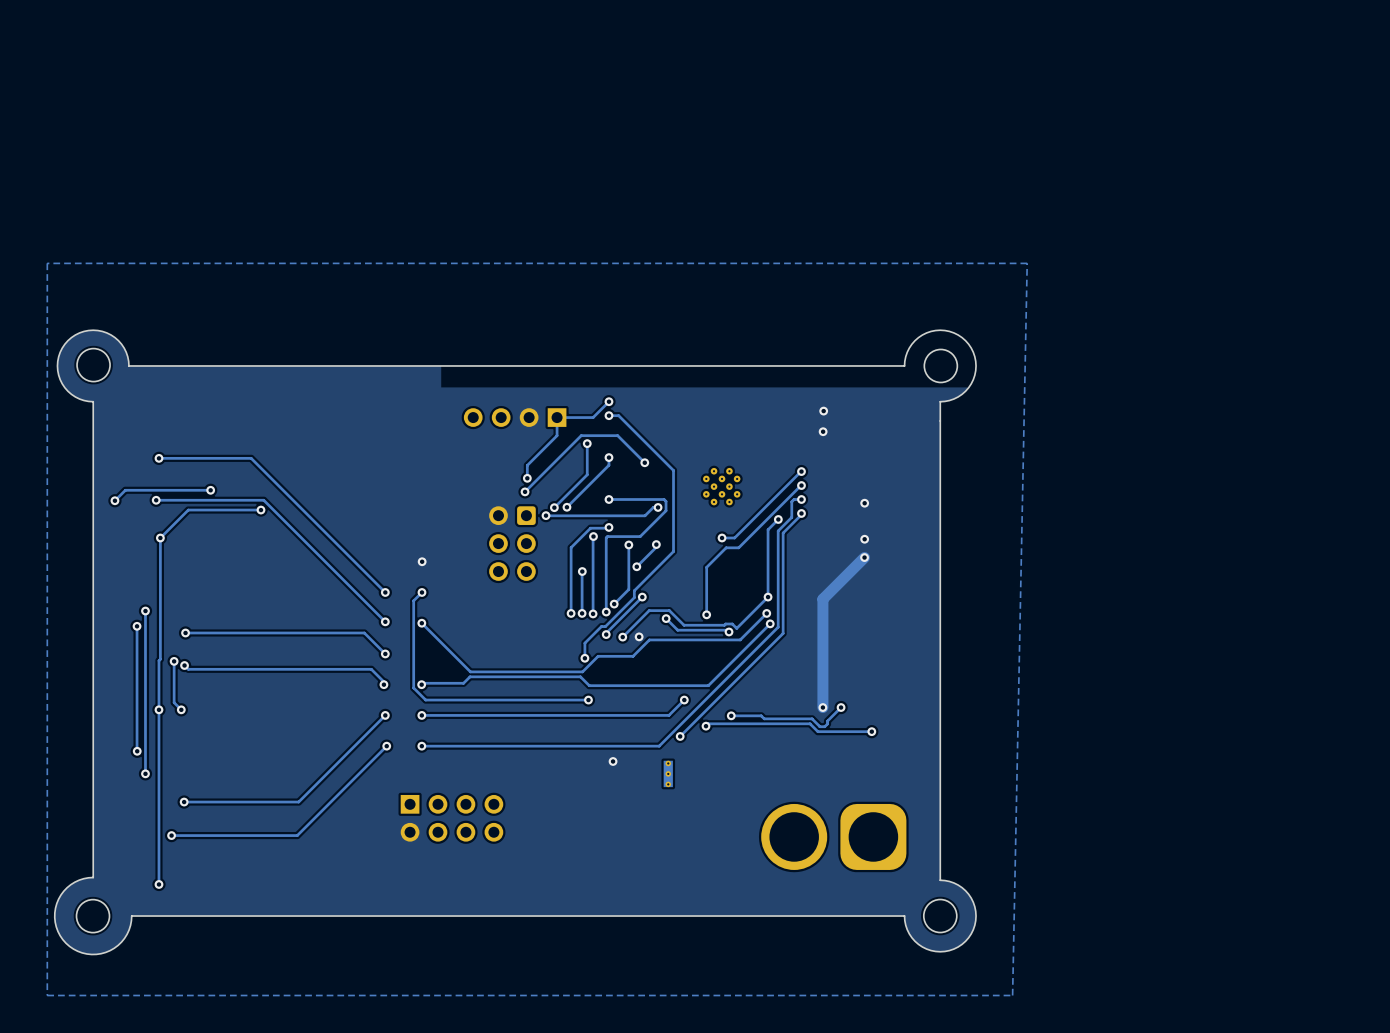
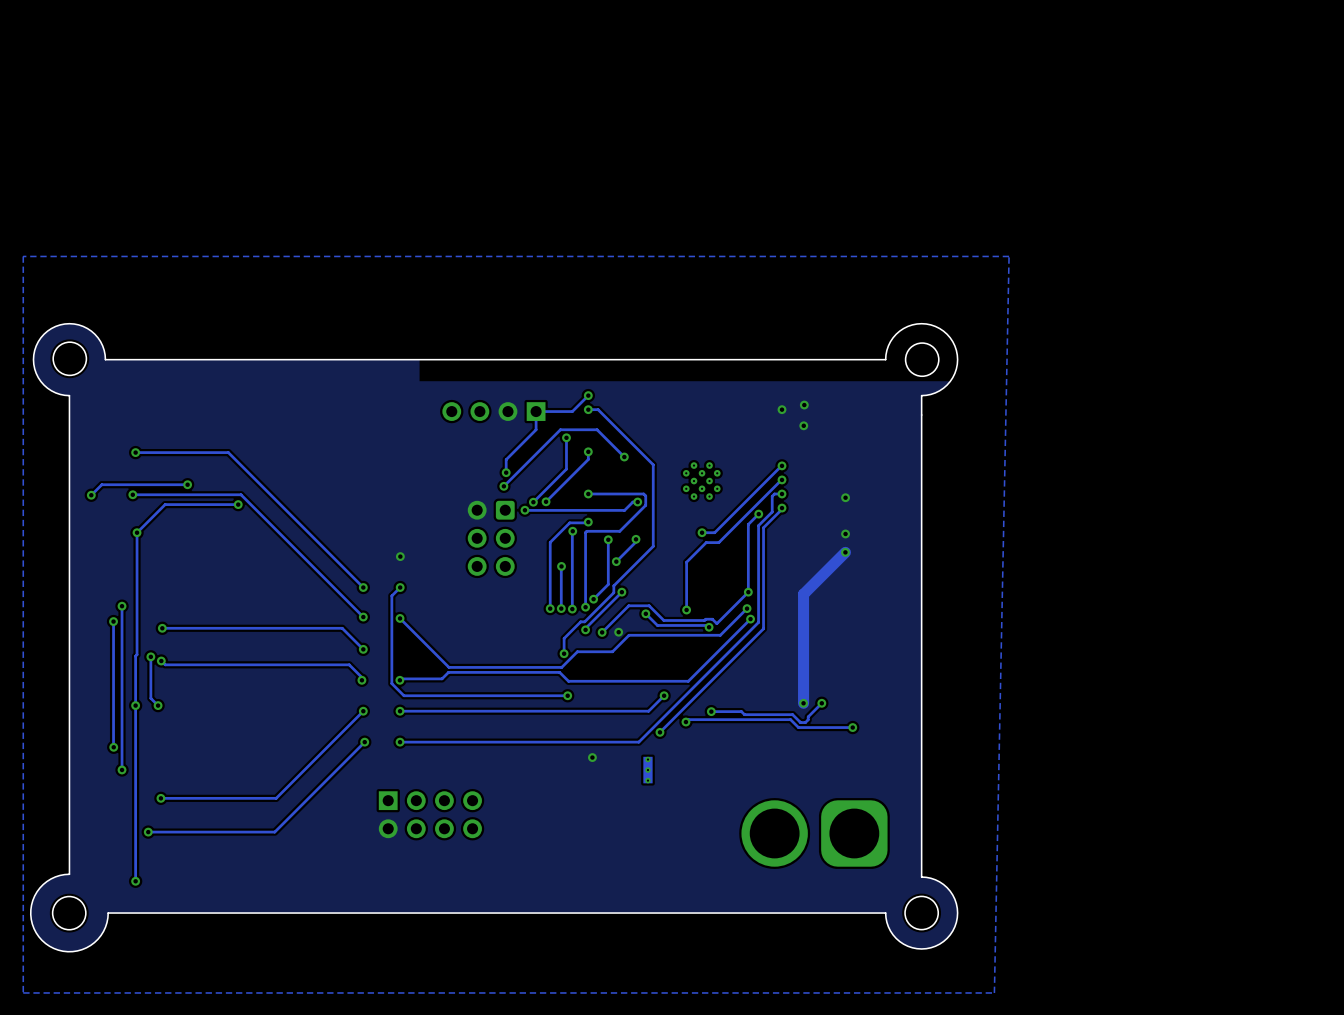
via: none -> (782, 409)

